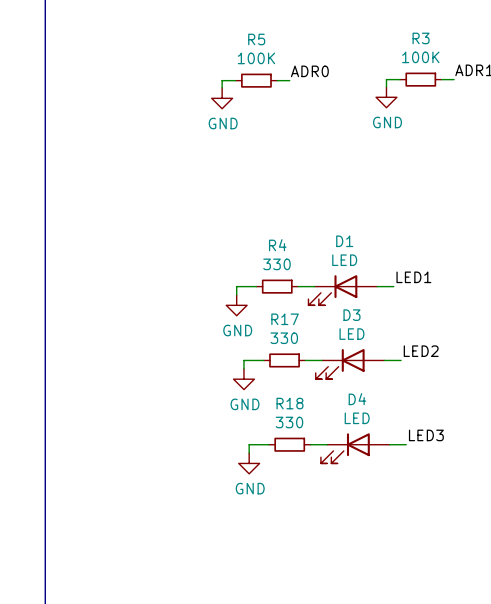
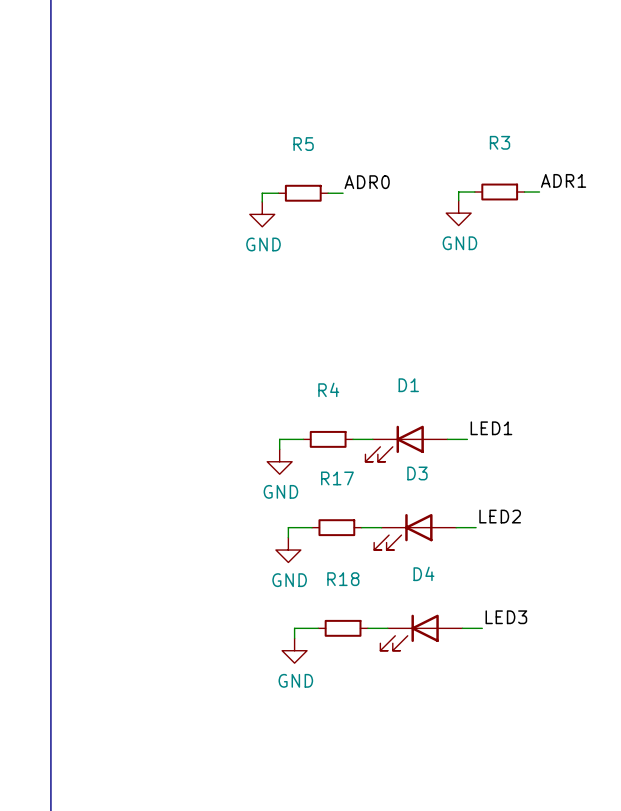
R3 value: 100K (420, 57) -> none
R5 value: 100K (256, 58) -> none
D1 value: LED (344, 260) -> none
R4 value: 330 (277, 264) -> none
D3 value: LED (351, 334) -> none
R17 value: 330 (284, 338) -> none
D4 value: LED (357, 418) -> none
R18 value: 330 (289, 422) -> none

